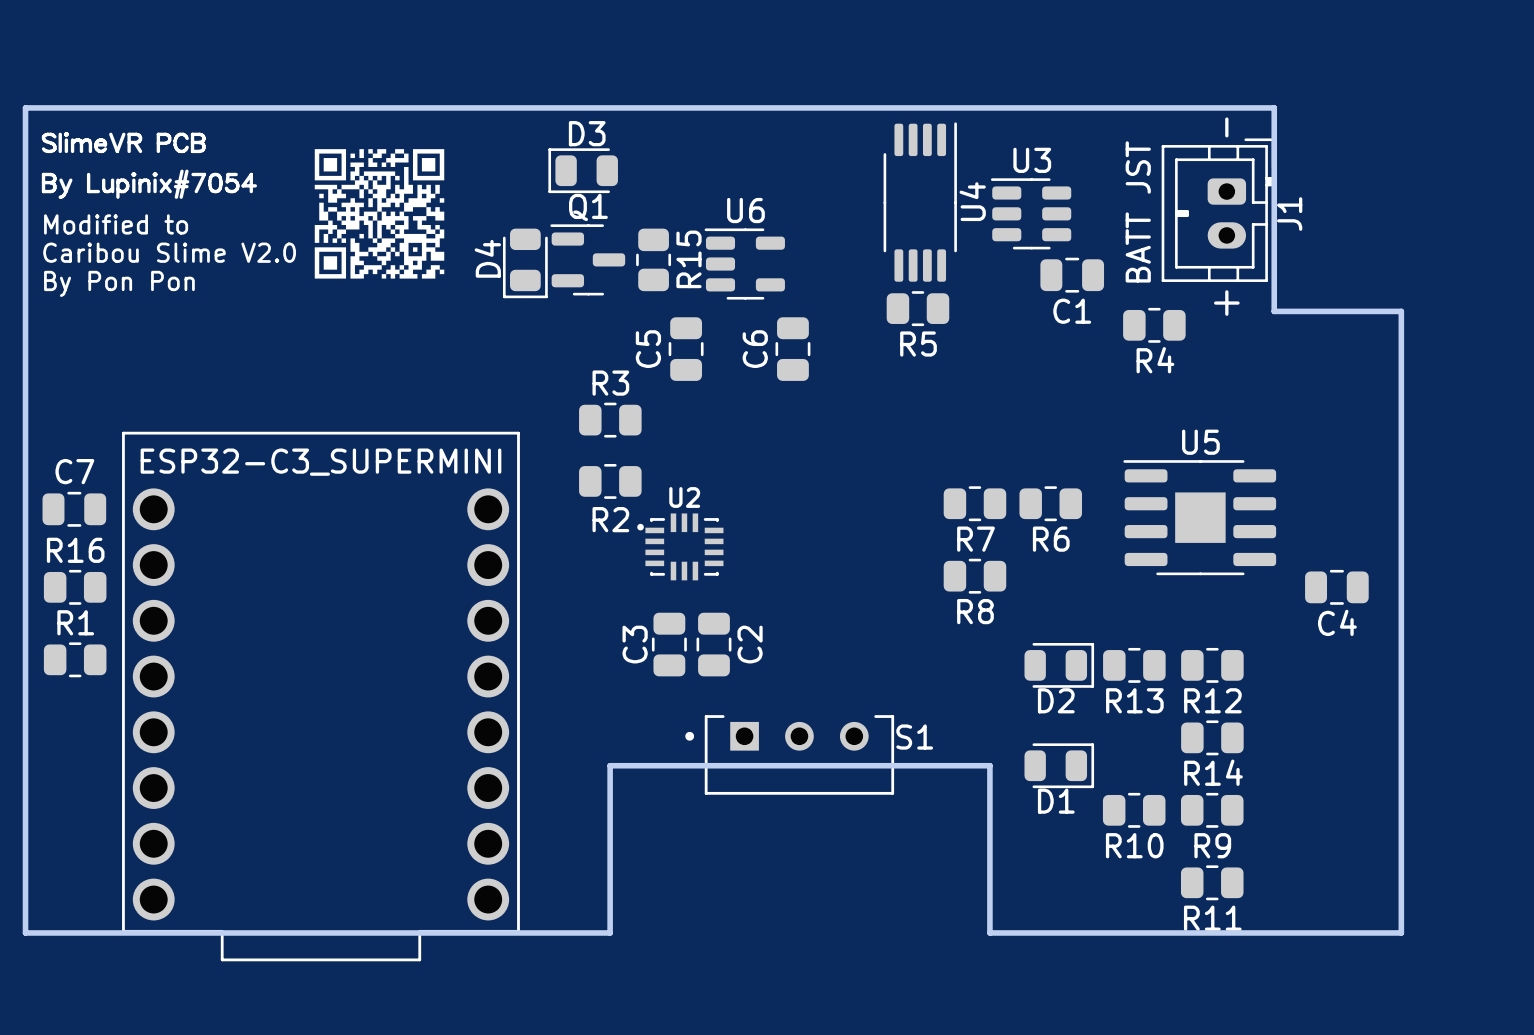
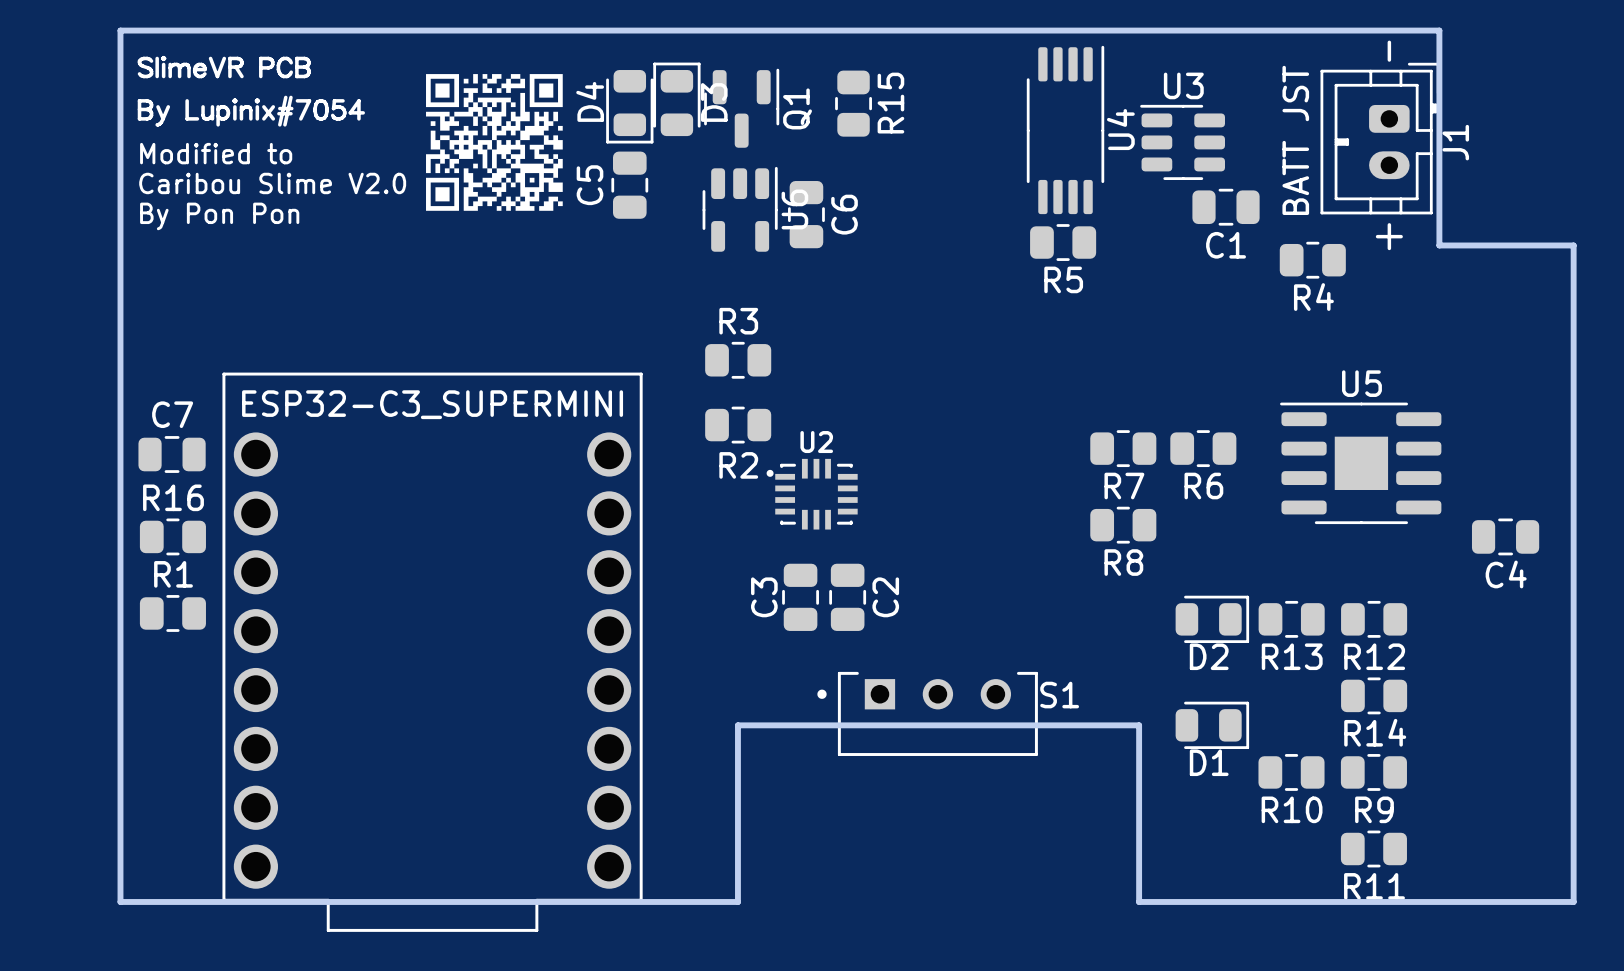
D3 rotation: 0° (583, 170) -> 90° clockwise (676, 99)
Q1 rotation: 0° (587, 259) -> 90° clockwise (741, 108)
Q1 position: (587, 259) -> (741, 108)
R15 position: (653, 259) -> (853, 103)
D4 position: (525, 263) -> (629, 106)
U6 rotation: 0° (744, 264) -> 90° clockwise (740, 209)
U6 position: (744, 264) -> (740, 209)
C5 position: (686, 349) -> (629, 185)
C6 name position: C6 (755, 349) -> C6 (844, 214)
C6 position: (792, 349) -> (806, 214)

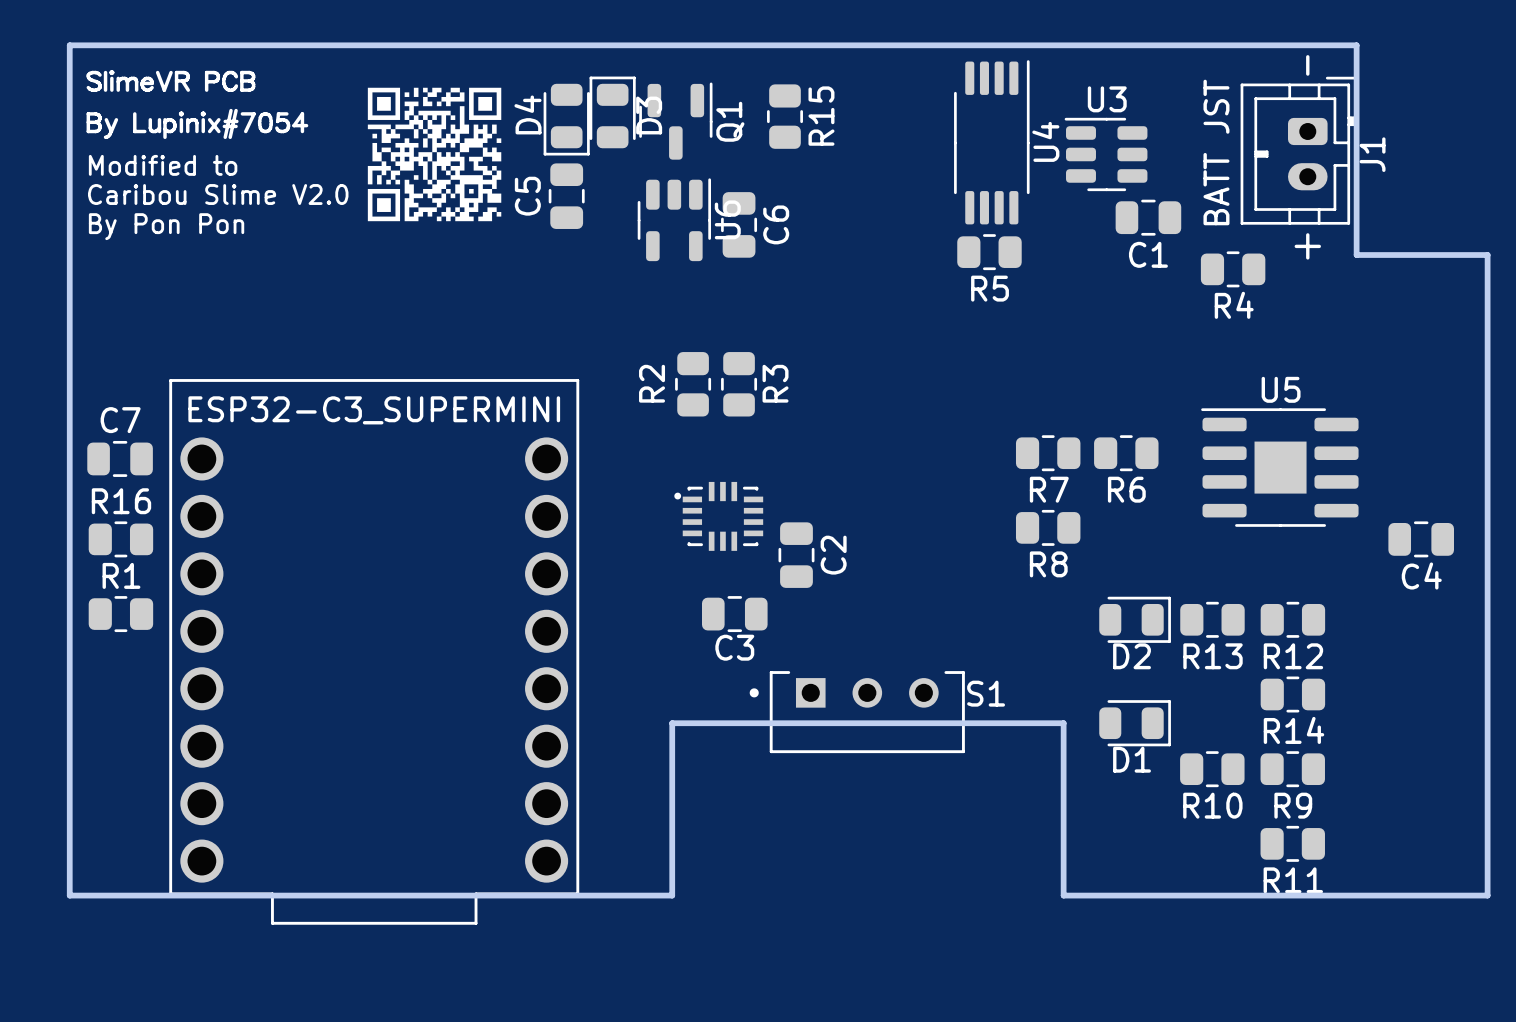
R3 rotation: 0° (738, 360) -> 90° clockwise (739, 384)
R3 position: (738, 360) -> (739, 384)
R2 rotation: 0° (738, 425) -> 90° clockwise (693, 384)
R2 position: (738, 425) -> (693, 384)
U2: (812, 494) -> none
part: none -> (718, 516)
C3 name position: C3 (764, 597) -> C3 (734, 647)
C3 rotation: 0° (800, 597) -> 90° clockwise (734, 614)
C2 position: (847, 597) -> (796, 555)

